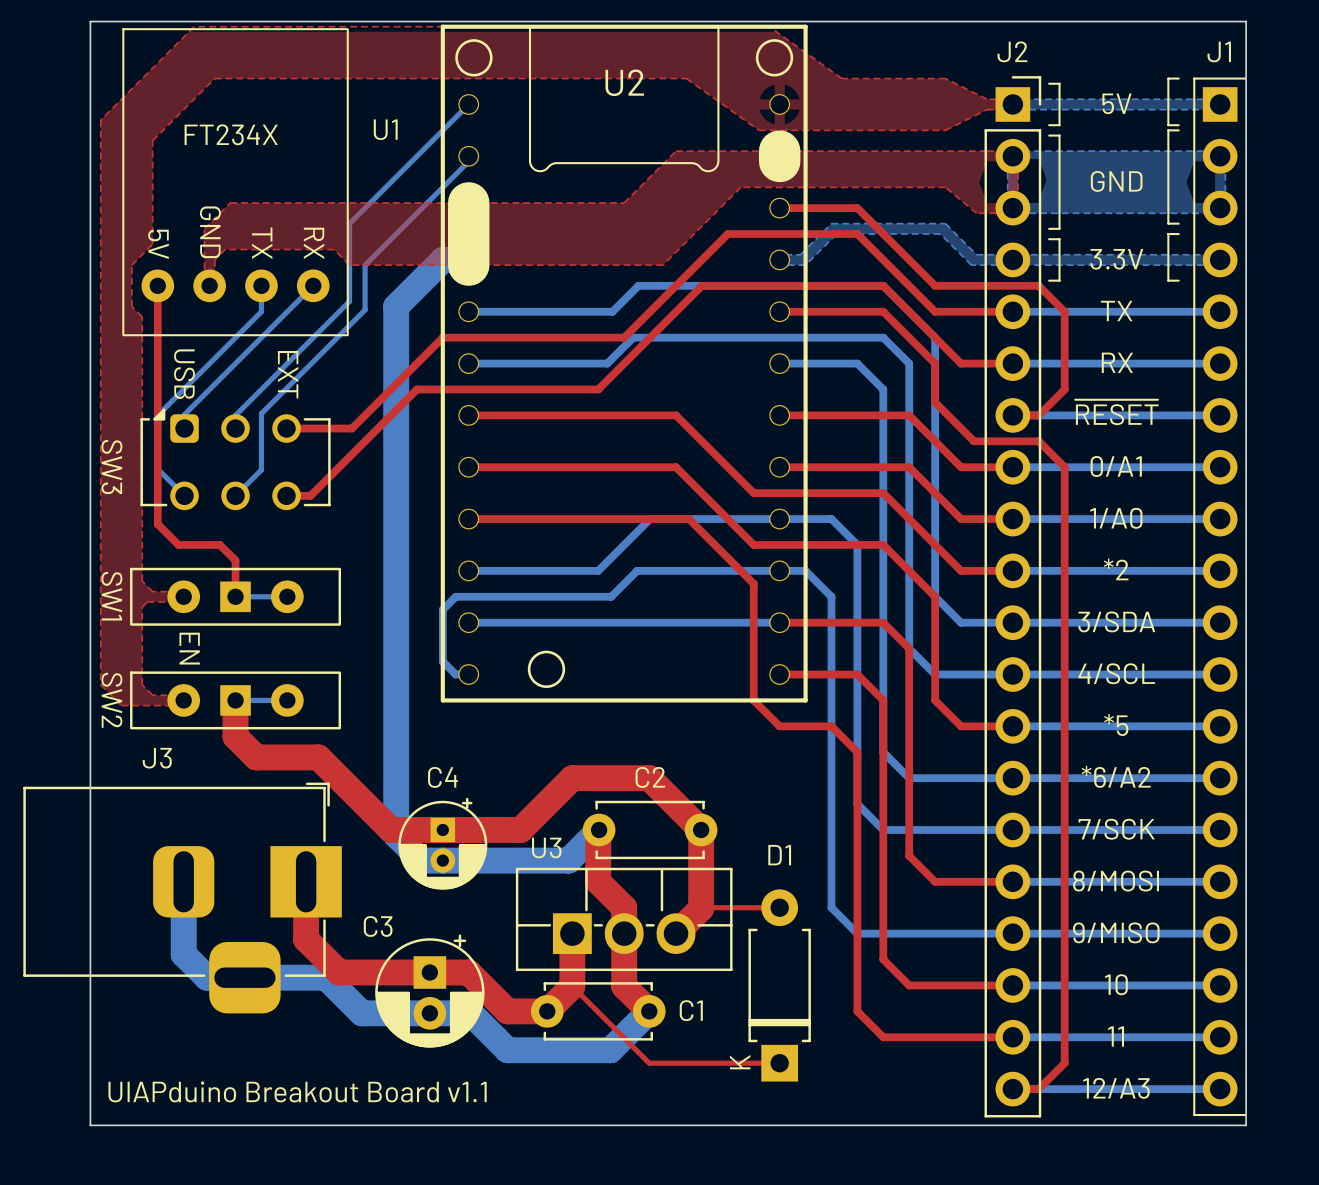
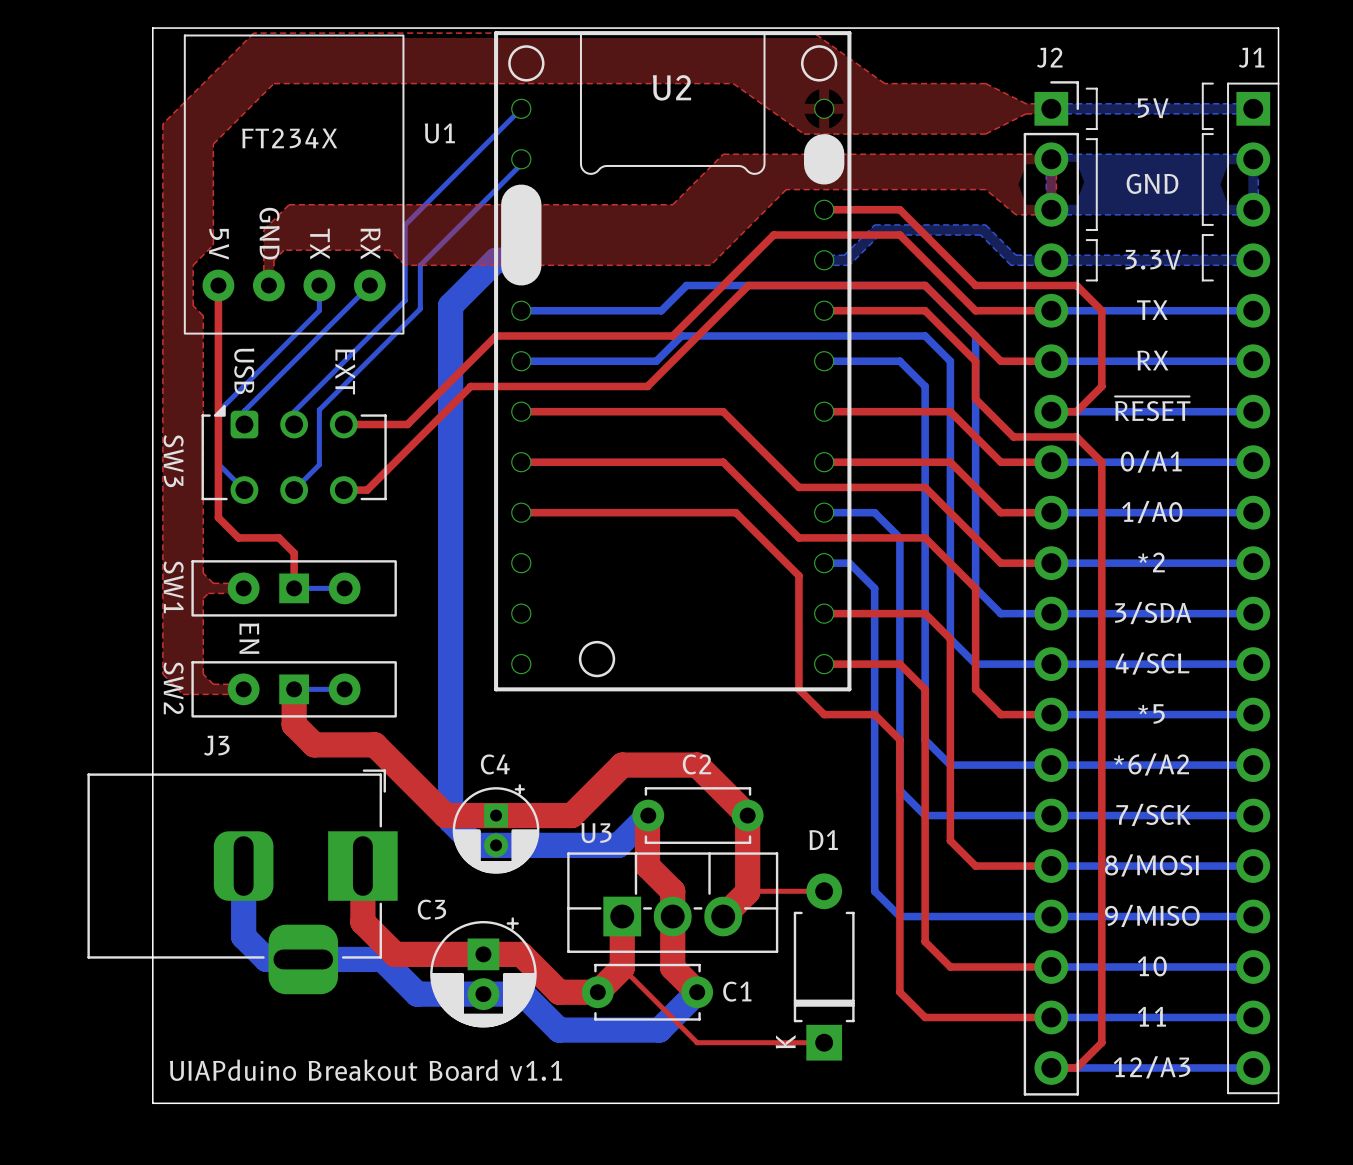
bottom track: (779, 519) (650, 519) (598, 570) (468, 570) -> none
bottom track: (779, 570) (637, 570) (611, 596) (455, 596) (442, 609) (442, 661) (455, 674) (468, 674) -> none
bottom track: (468, 622) (779, 622) -> none

